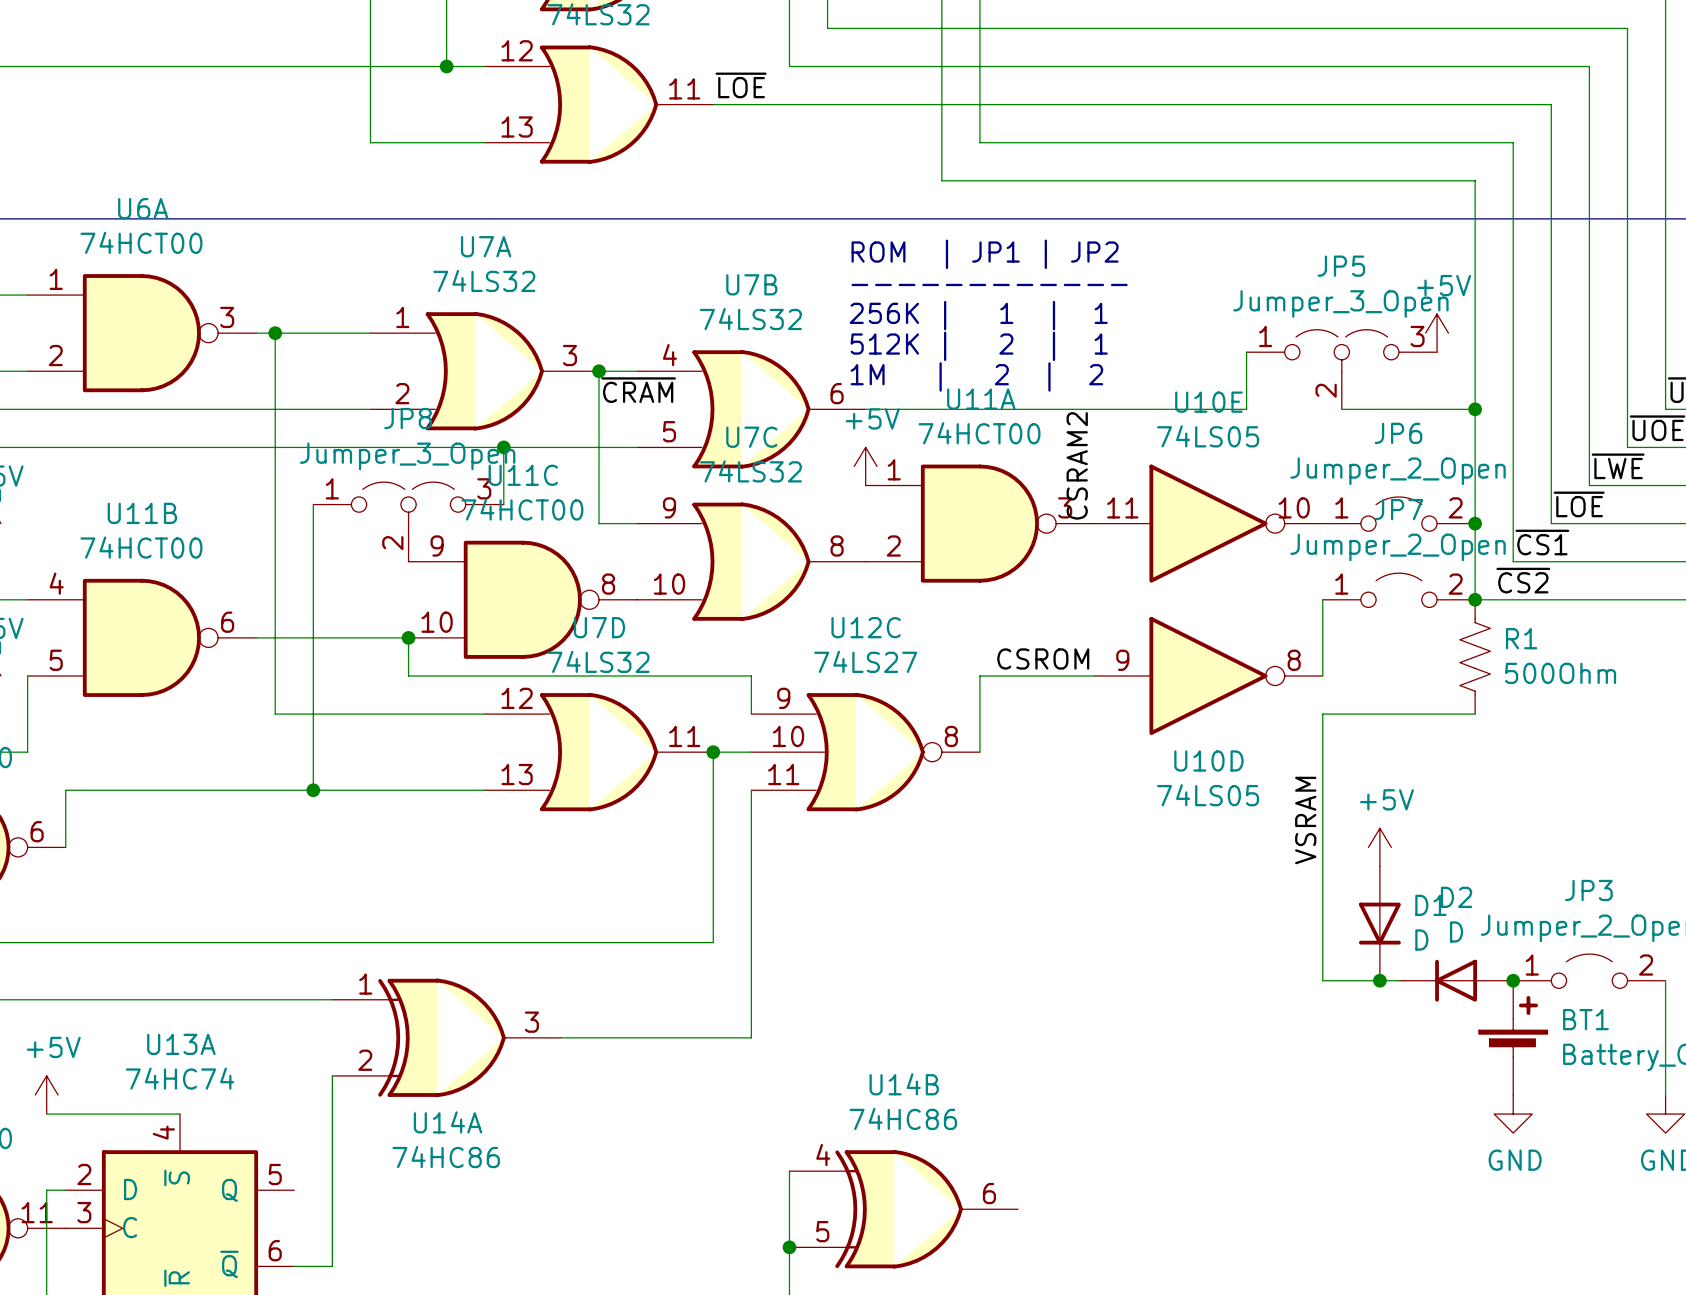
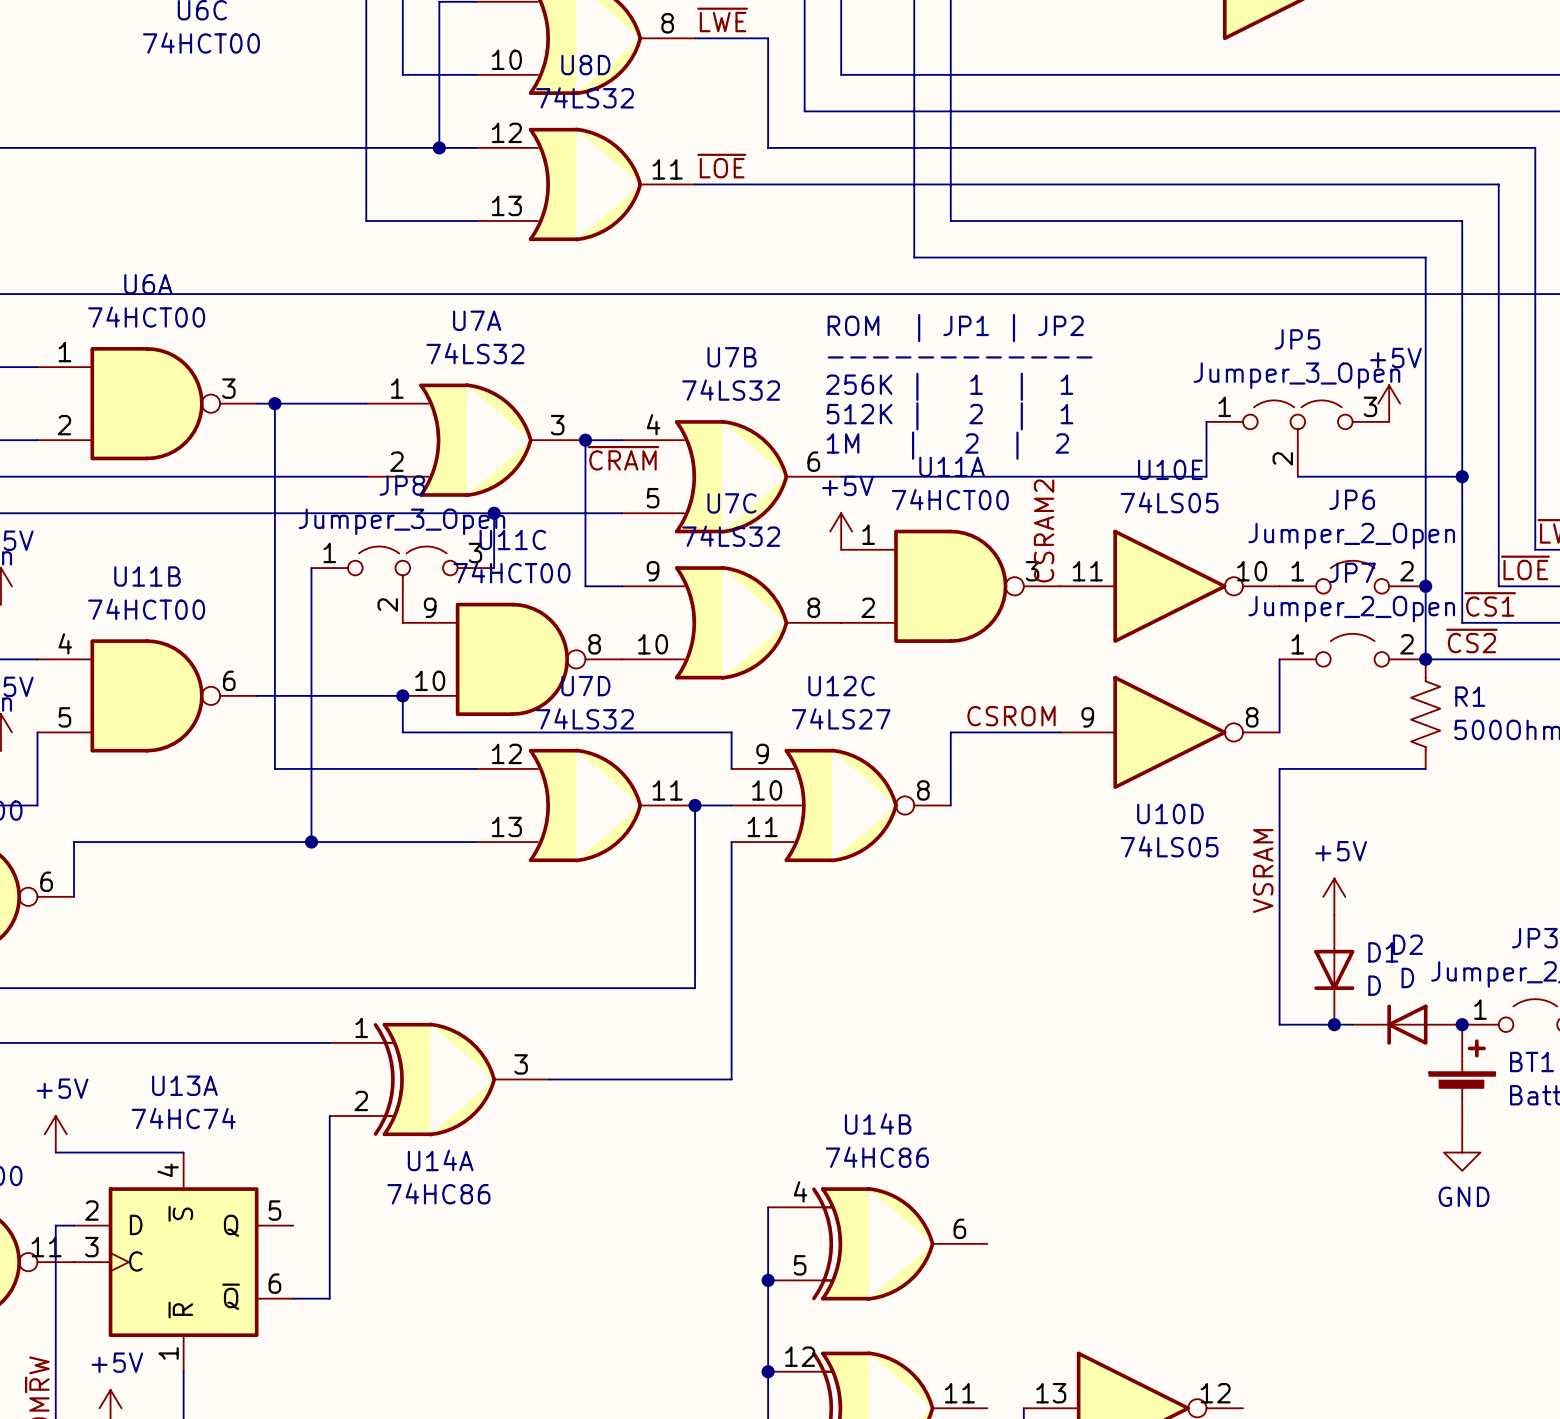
wire: none -> (1425, 476) (1462, 476)
junction position: (1475, 409) -> (1462, 476)

